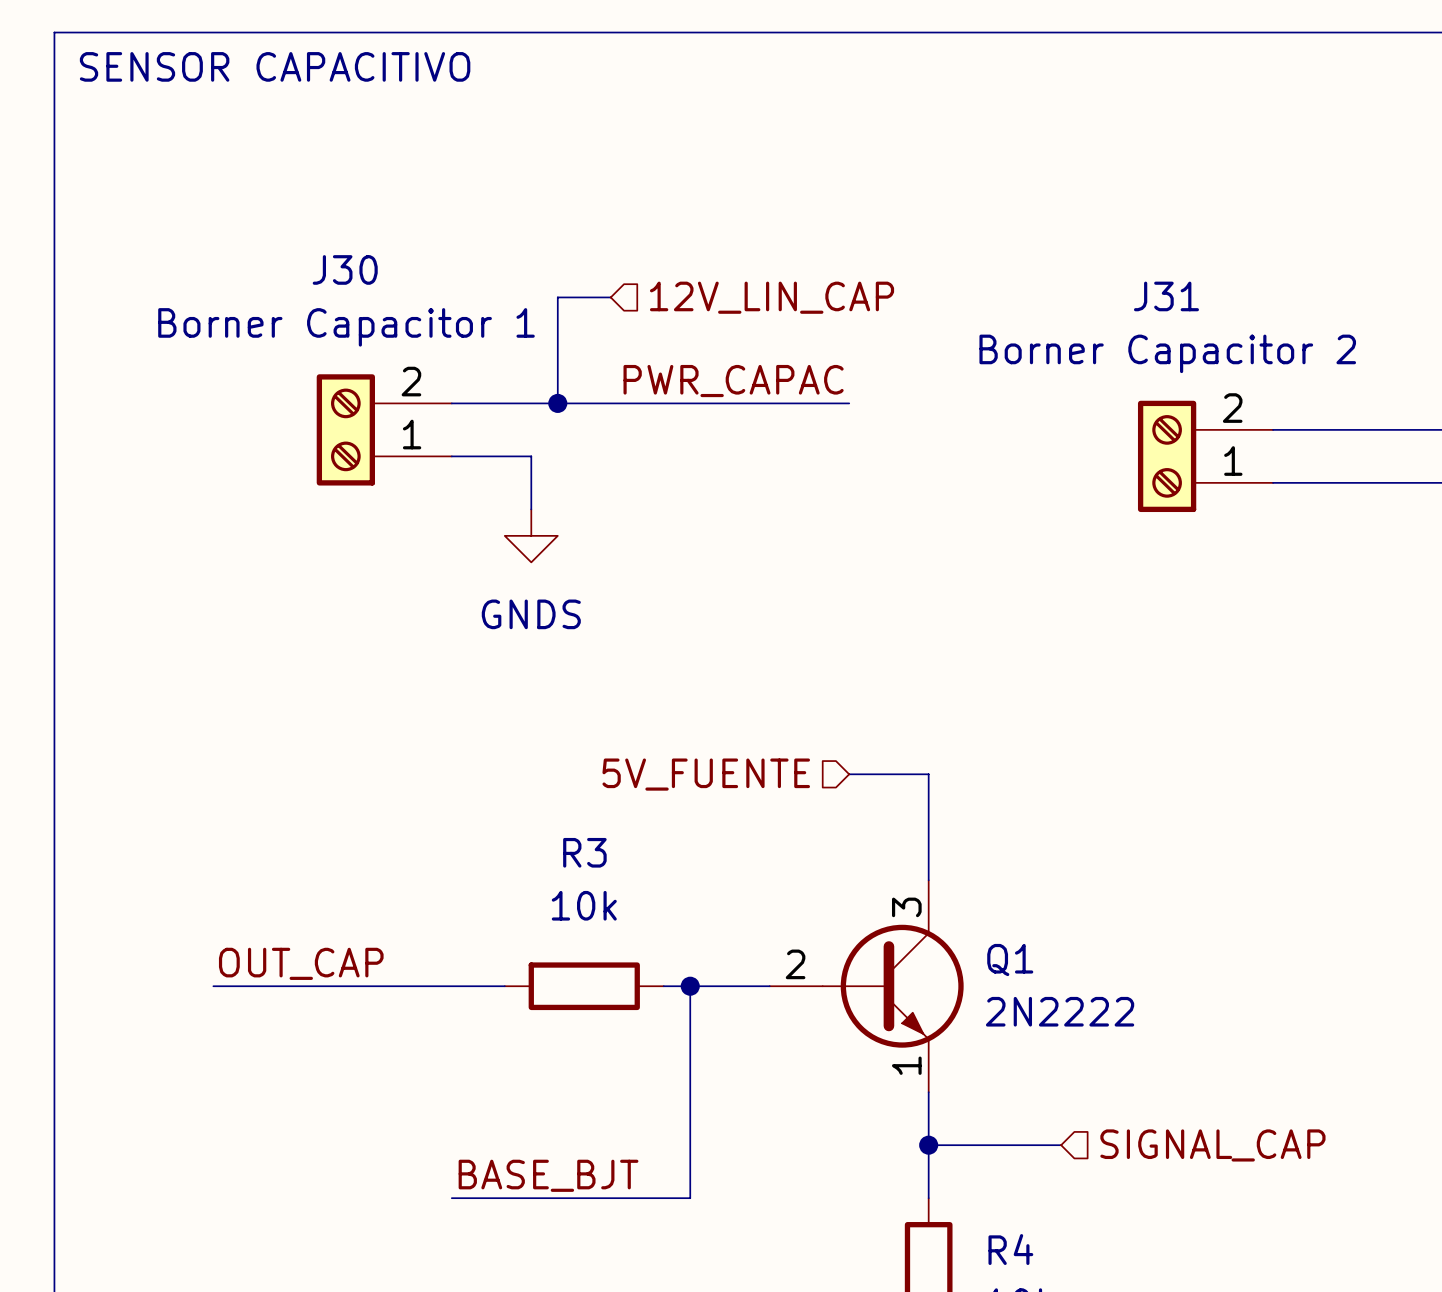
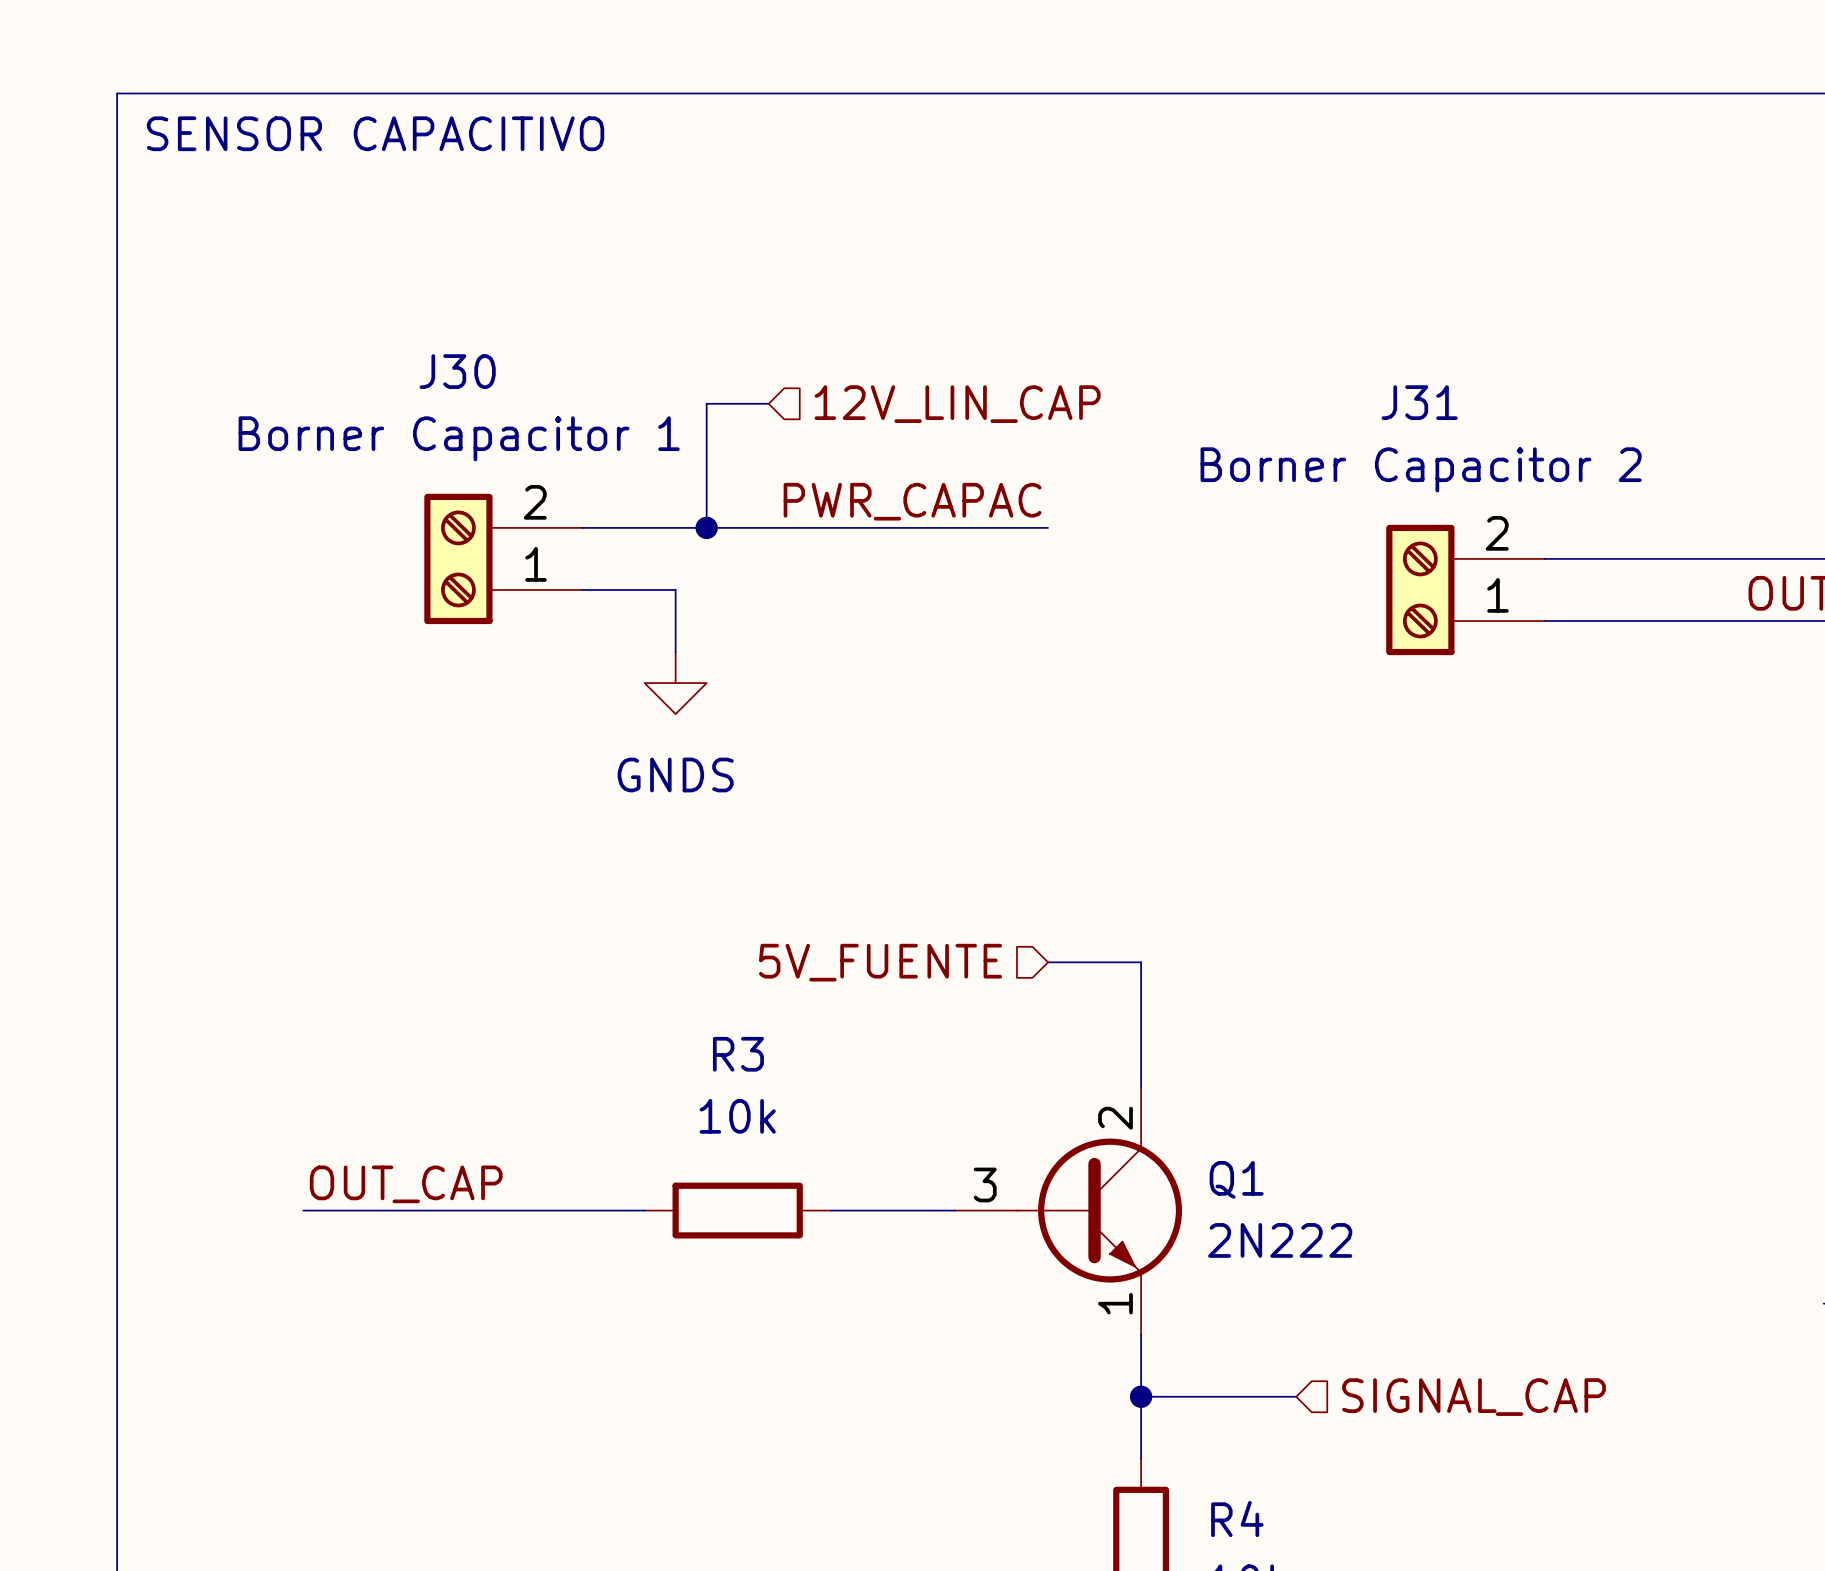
Q1 pin number: 3 (906, 907) -> 2 (1115, 1118)
Q1 pin number: 2 (795, 964) -> 3 (985, 1184)
wire: (690, 986) (690, 1198) (451, 1198) -> none
junction: (690, 986) -> none
Q1 value: 2N2222 (1060, 1011) -> 2N222 (1280, 1240)
label: BASE_BJT (548, 1175) -> none

